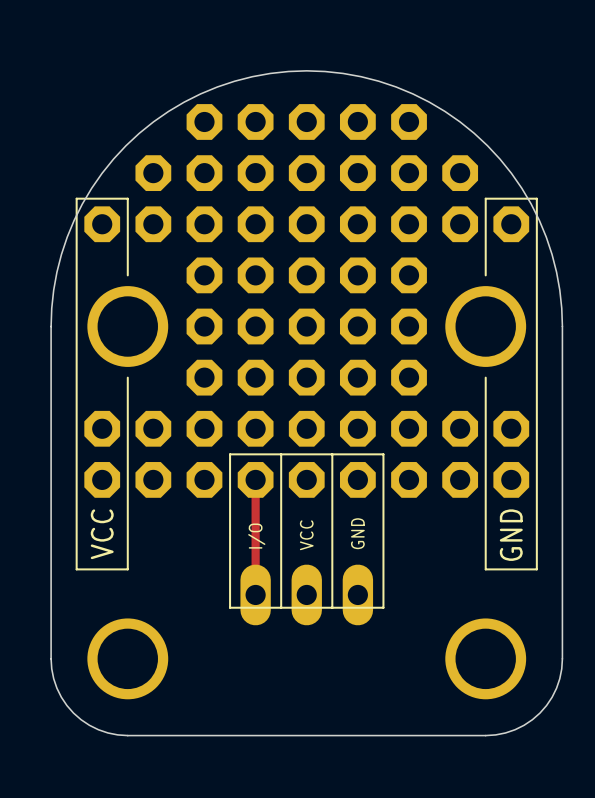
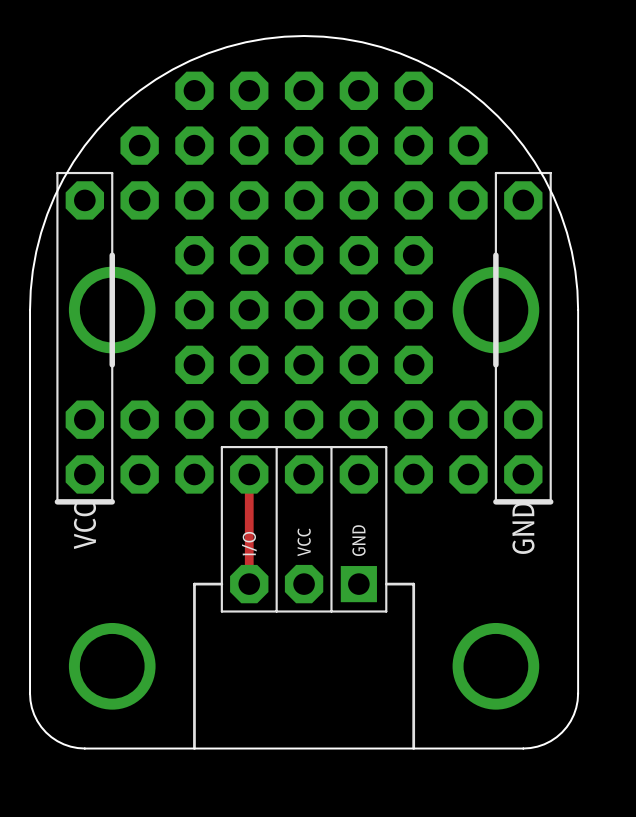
part footprint: [51, 70, 563, 736] -> [30, 36, 579, 750]
line: none -> (112, 255) (112, 364)
line: none -> (495, 255) (495, 364)
line: (76, 505) (76, 569) (127, 569) (127, 505) -> (57, 501) (112, 501)
line: (485, 505) (485, 569) (536, 569) (536, 505) -> (495, 501) (550, 501)

